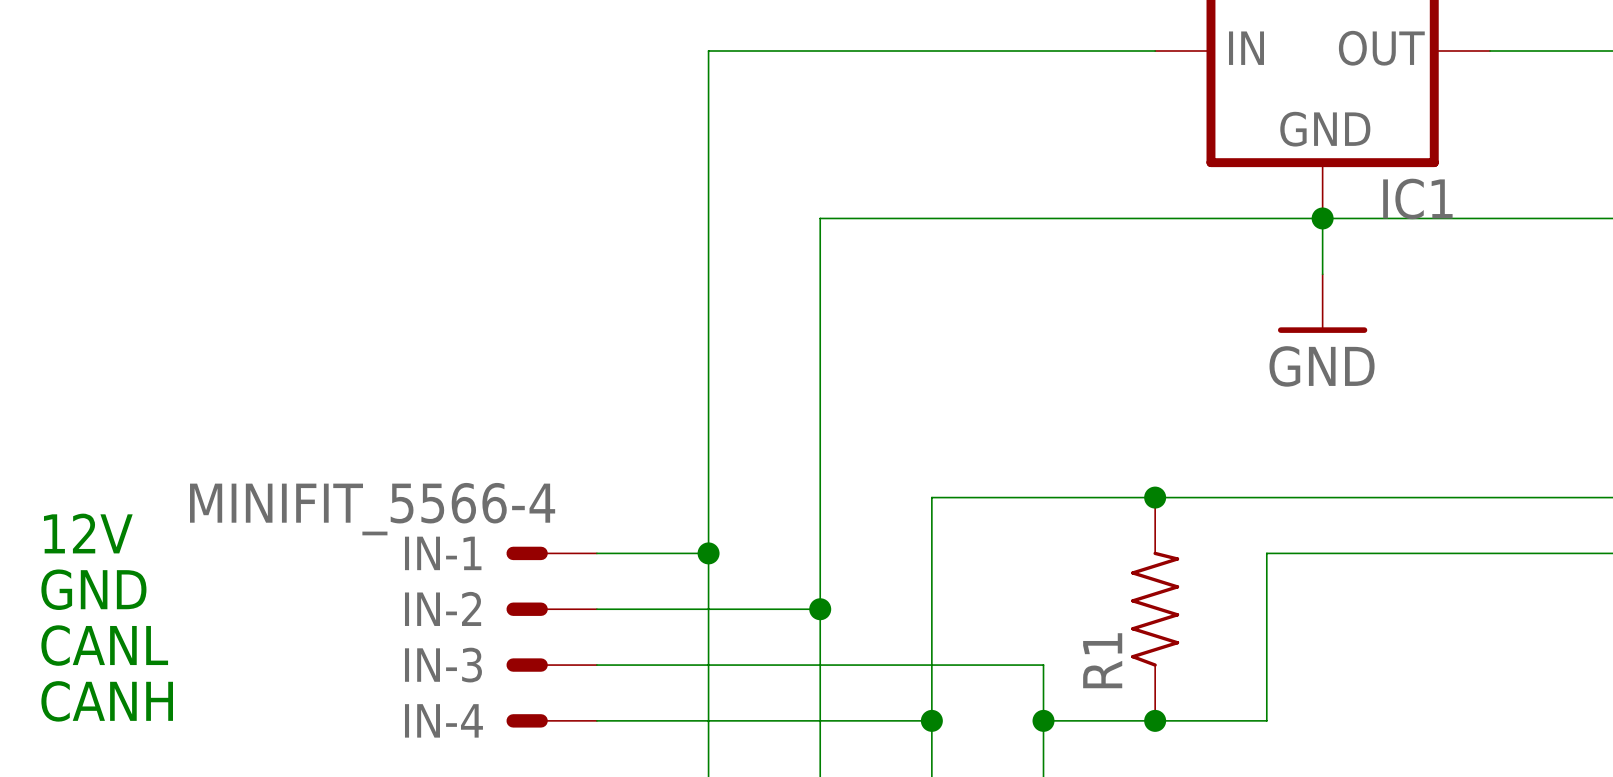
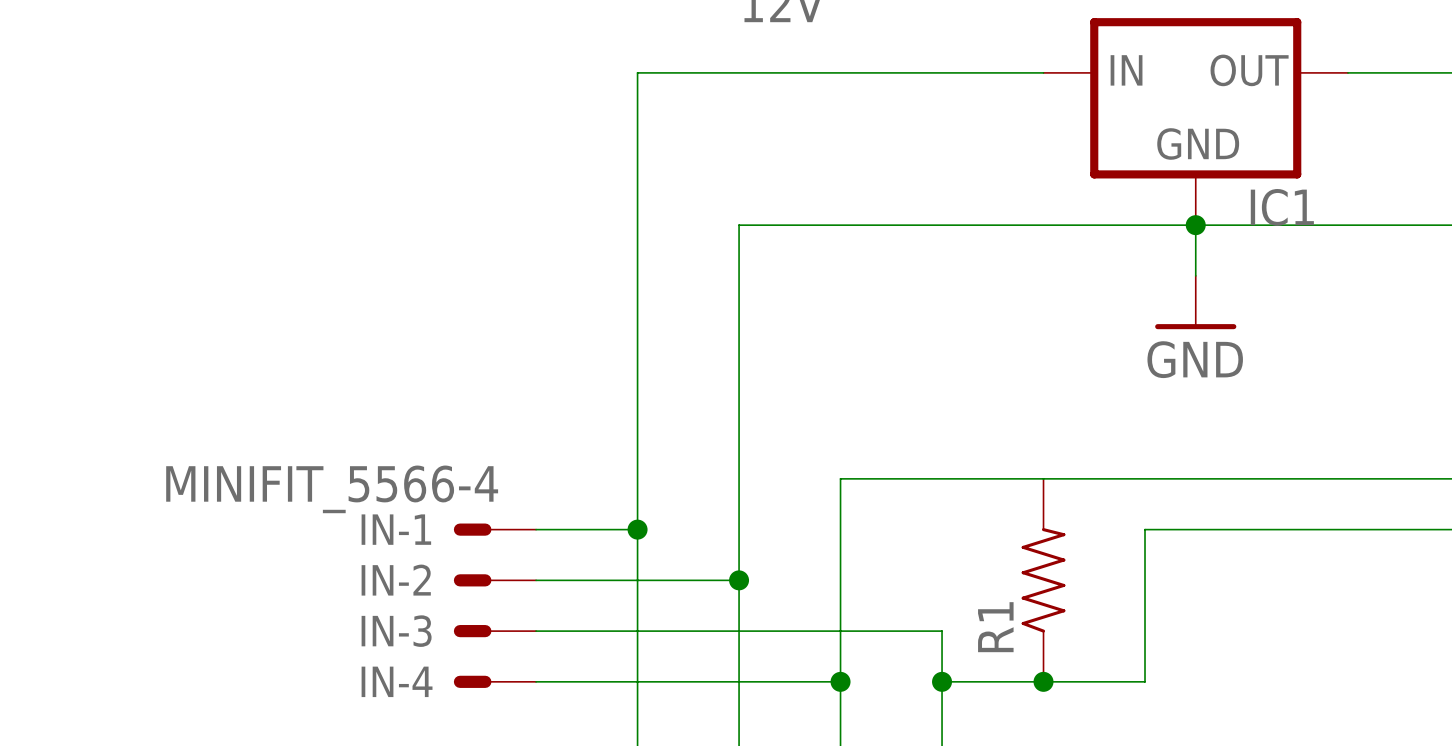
junction: (1155, 497) -> none
text: 12V (88, 533) -> none
text: GND (93, 589) -> none
text: CANL (104, 645) -> none
text: CANH (107, 701) -> none

